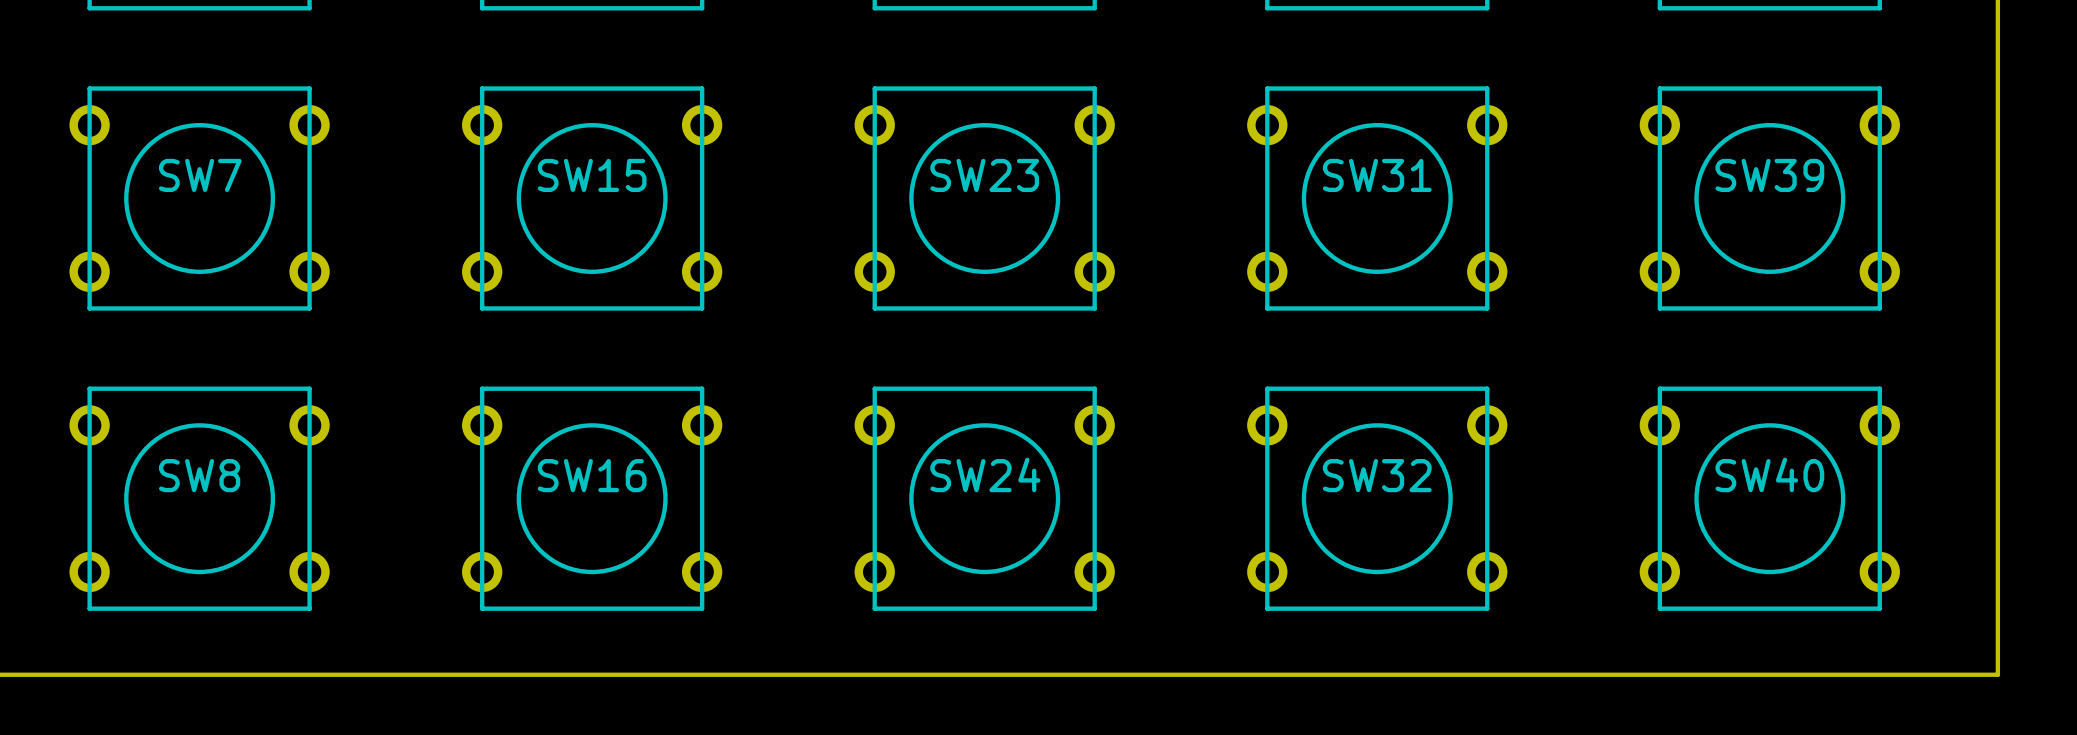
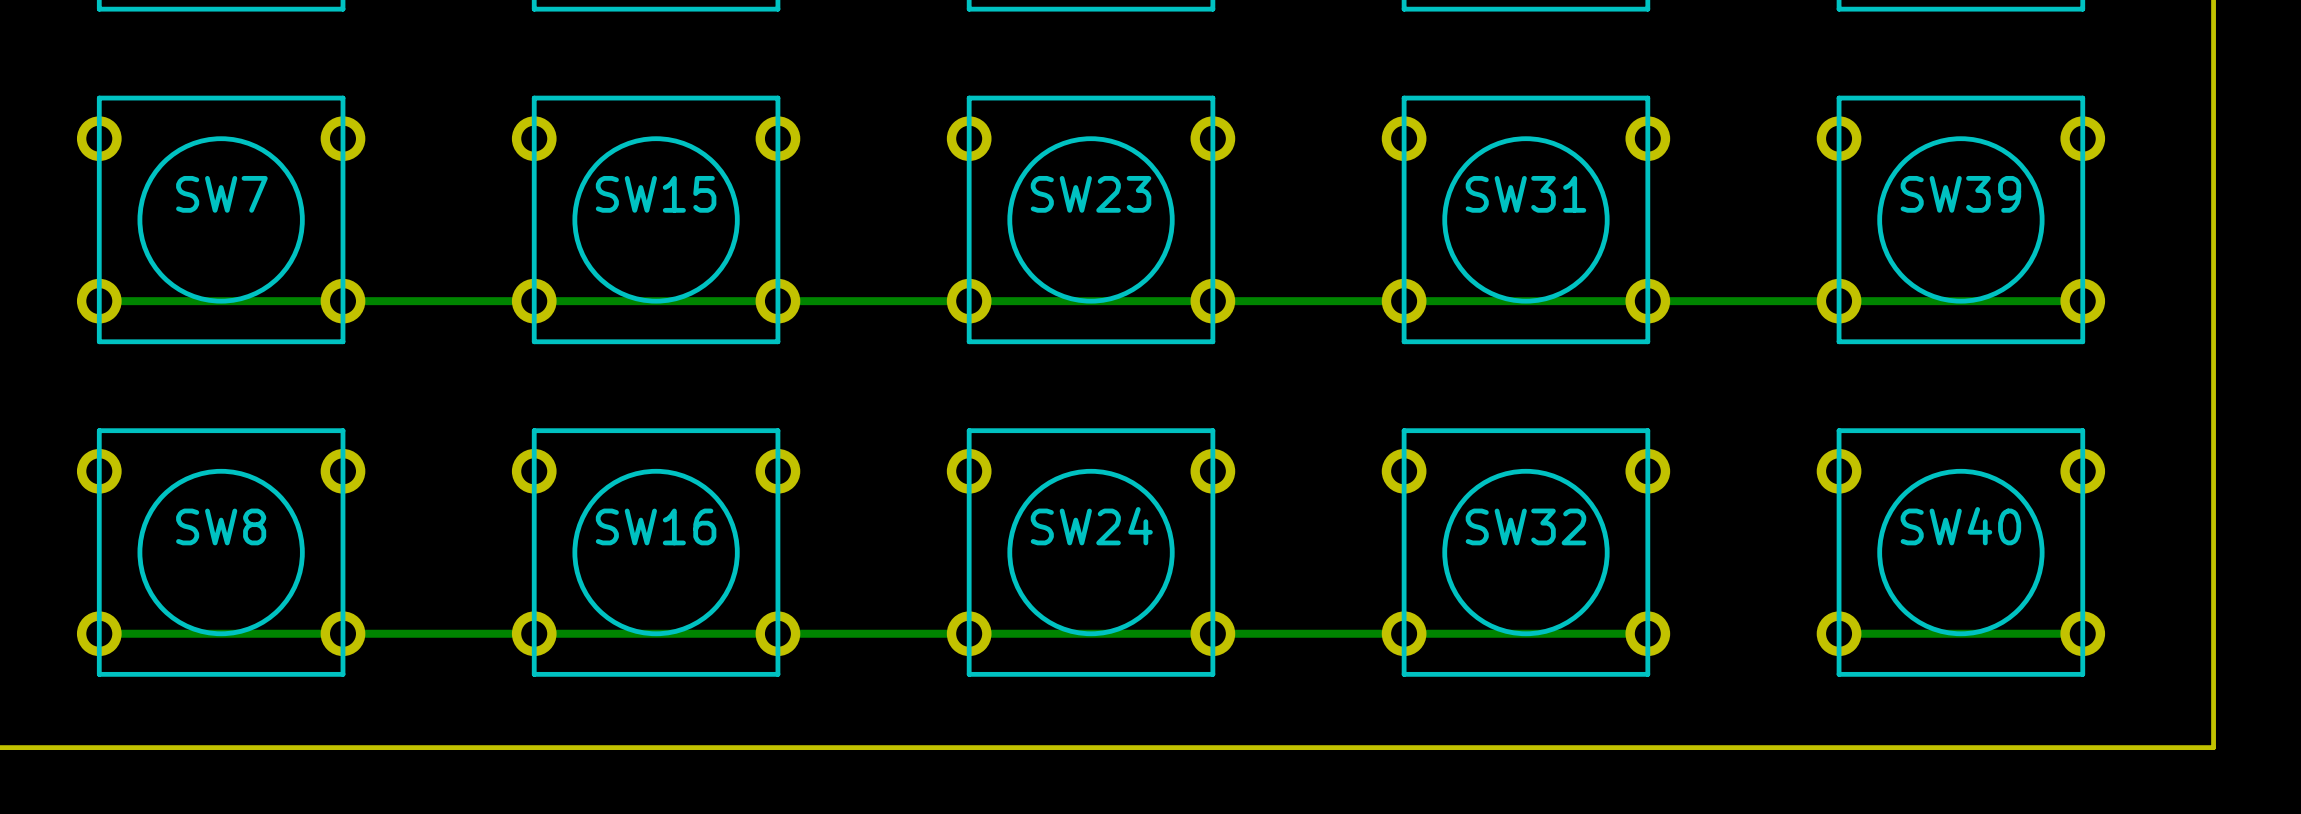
track: none -> (2082, 301) (99, 301)
track: none -> (1647, 633) (99, 633)
track: none -> (2082, 633) (1839, 633)

